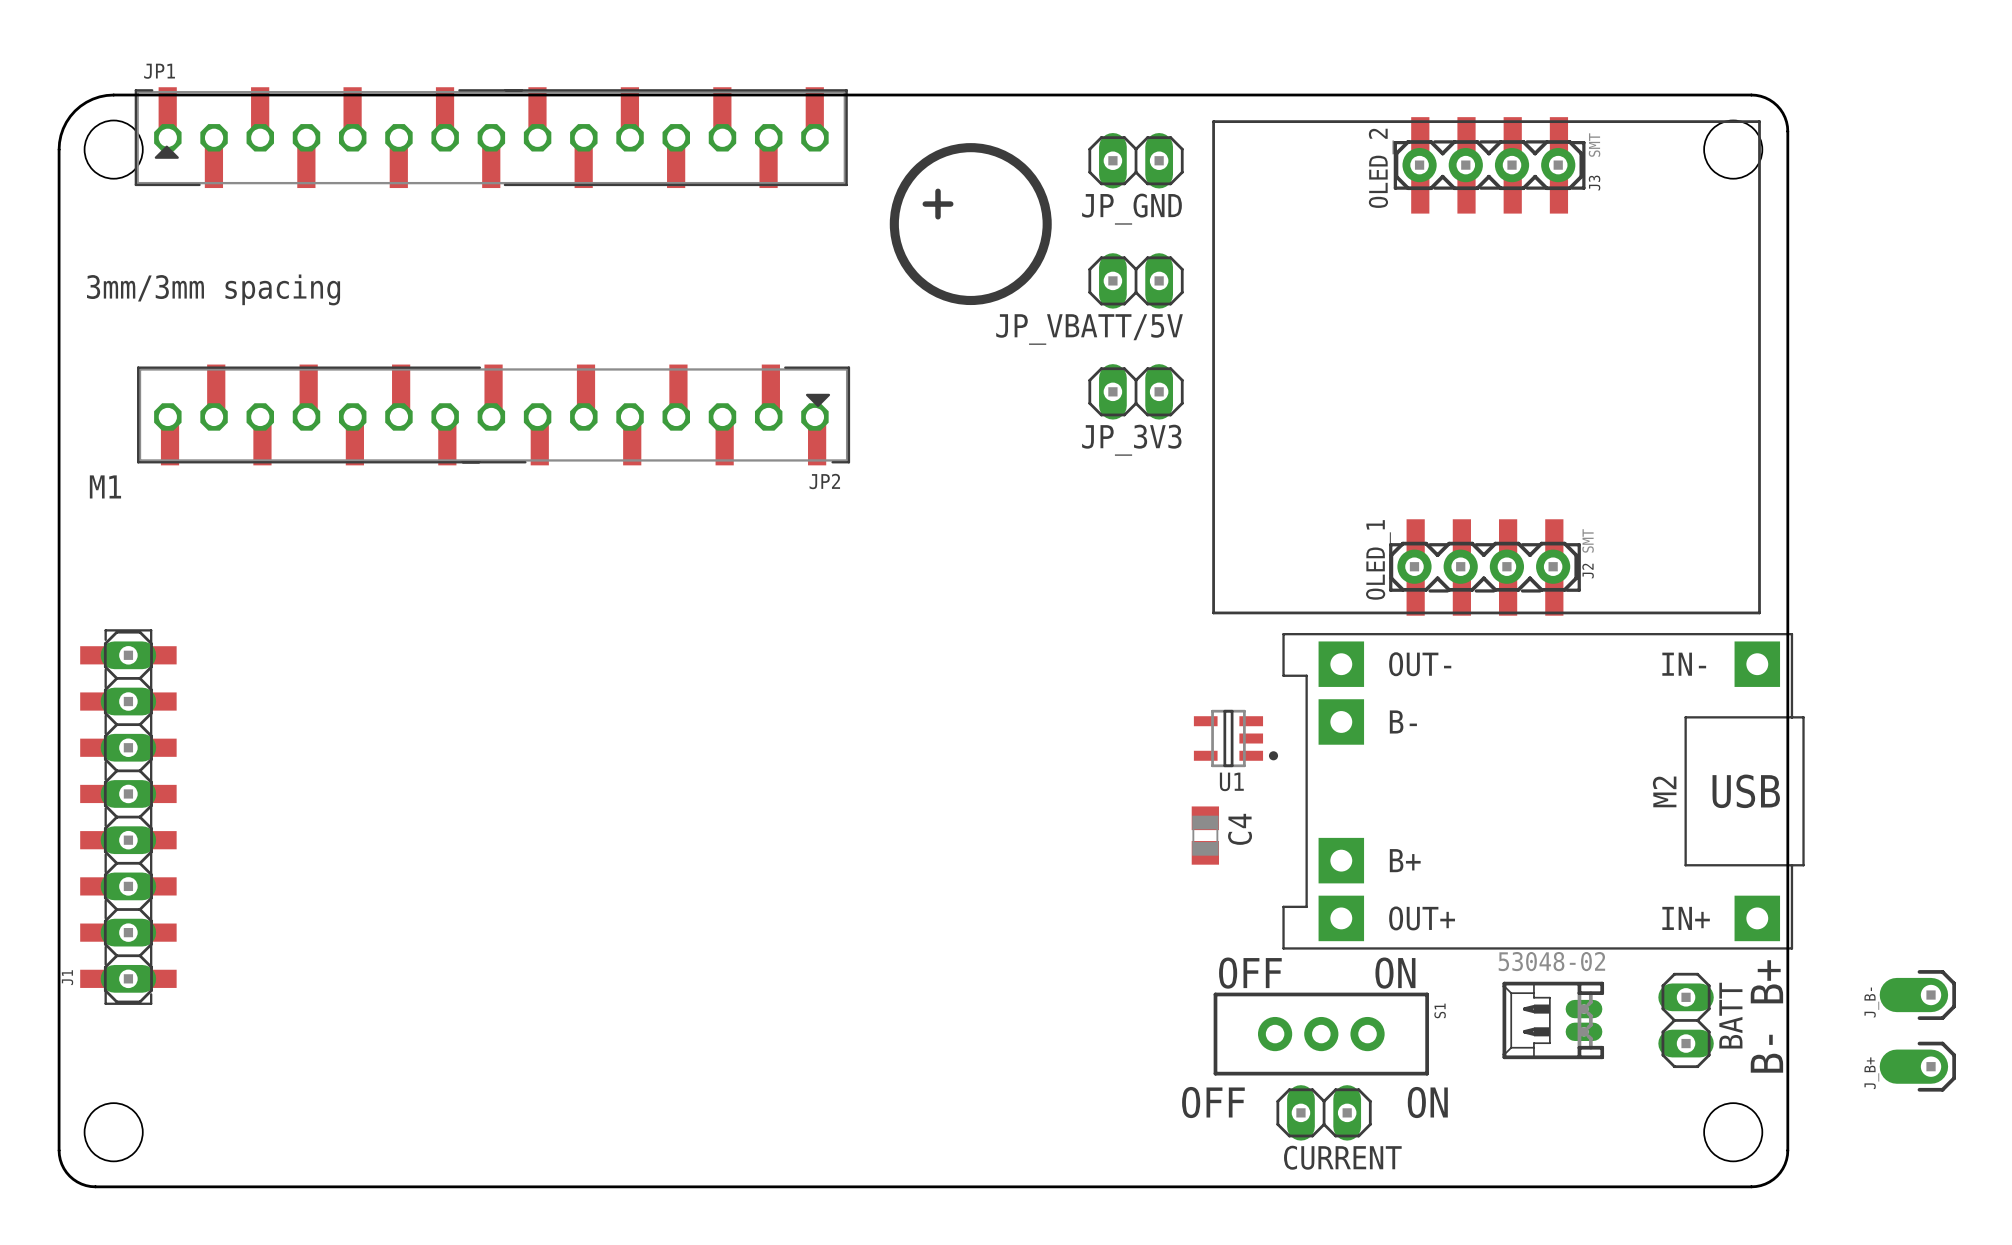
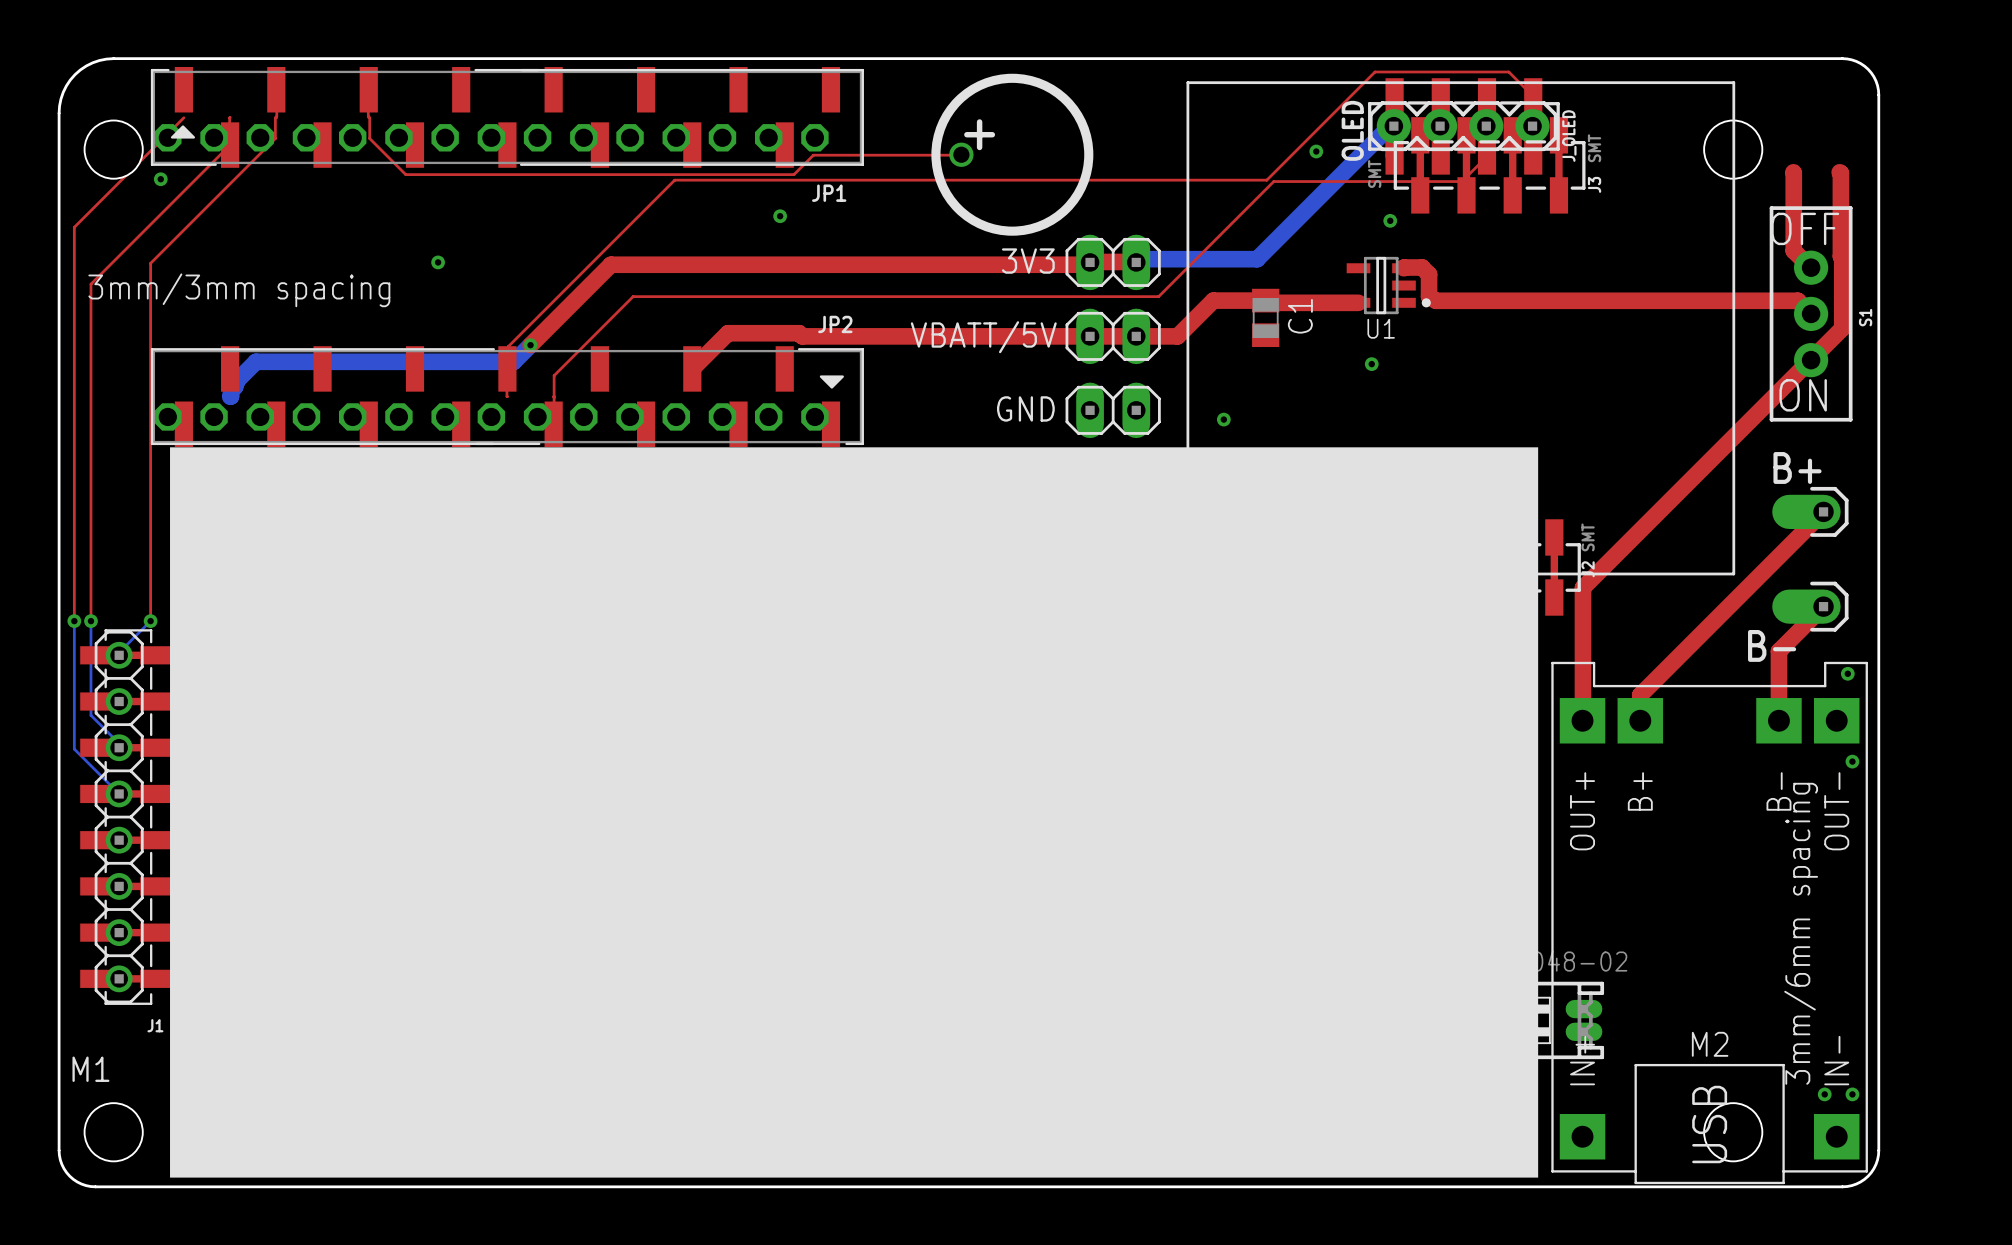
JP1 name position: JP1 (159, 71) -> JP1 (829, 193)
top track: none -> (276, 89) (275, 138) (150, 263) (150, 621)
top track: none -> (368, 89) (369, 138) (405, 174) (793, 174) (813, 155) (961, 154)
top track: none -> (1533, 95) (1508, 72) (1374, 72) (1266, 180) (674, 180) (508, 346) (507, 396)
top track: none -> (183, 117) (74, 227) (74, 621)
top track: none -> (230, 117) (230, 145) (90, 284) (90, 621)
line: (1213, 121) (1759, 121) (1759, 612) (1213, 612) (1213, 121) -> (1187, 82) (1733, 82) (1733, 574) (1187, 574) (1187, 82)
bottom track: none -> (1393, 126) (1388, 127) (1257, 259) (1139, 259) (1136, 262)
OLED: none -> (1463, 126)
J_OLED: none -> SMT (1463, 126)
top track: none -> (1486, 126) (1487, 157) (1461, 181) (1273, 181) (1158, 296) (633, 296) (554, 375) (553, 424)
JP1 position: (491, 137) -> (507, 117)
board edge: (59, 149) (63, 128) (75, 111) (92, 99) (113, 95) (1751, 95) (1769, 99) (1782, 113) (1787, 131) (1787, 1150) (1785, 1164) (1777, 1176) (1765, 1184) (1751, 1186) -> (59, 149) (59, 106) (66, 85) (75, 74) (86, 65) (99, 60) (113, 58) (1842, 58) (1860, 63) (1873, 76) (1878, 95) (1878, 1155) (1873, 1168) (1868, 1176) (1851, 1185) (1751, 1186)
via: none -> (1316, 151)
via: none -> (961, 154)
JP_GND: (1136, 160) -> none
OLED_2: (1488, 165) -> none
top track: none -> (1793, 172) (1793, 250) (1811, 267)
top track: none -> (1839, 172) (1842, 328) (1582, 587) (1582, 720)
via: none -> (160, 179)
line: (938, 191) (938, 216) -> (979, 121) (979, 147)
line: (925, 204) (950, 204) -> (966, 134) (992, 134)
via: none -> (780, 216)
via: none -> (1390, 220)
drawing position: (970, 224) -> (1012, 154)
text: none -> OFF (1805, 228)
via: none -> (438, 262)
3V3: none -> (1113, 262)
top track: none -> (1136, 262) (1090, 261) (1082, 264) (610, 264) (530, 345)
top track: none -> (1404, 268) (1422, 267) (1429, 274) (1429, 296) (1436, 300) (1797, 300) (1811, 313)
JP_VBATT/5V: (1136, 280) -> none
top track: none -> (1358, 302) (1213, 300) (1177, 336) (802, 336) (799, 333) (728, 333) (692, 368)
C1: none -> (1265, 317)
VBATT/5V: none -> (1113, 336)
bottom track: none -> (530, 345) (513, 361) (255, 361) (236, 381) (230, 396)
via: none -> (530, 345)
via: none -> (1371, 364)
JP_3V3: (1136, 391) -> none
text: none -> ON (1803, 395)
GND: none -> (1113, 410)
JP2 position: (493, 414) -> (507, 396)
via: none -> (1223, 419)
drawing: none -> [170, 447, 1539, 1178]
JP2 name position: JP2 (824, 481) -> JP2 (835, 324)
M1 name position: M1 (105, 486) -> M1 (90, 1069)
B+: none -> (1810, 511)
top track: none -> (1823, 511) (1640, 695) (1640, 720)
OLED_1: (1483, 566) -> none
B-: none -> (1810, 606)
top track: none -> (1823, 606) (1778, 651) (1778, 720)
bottom track: none -> (74, 621) (74, 749) (119, 793)
via: none -> (74, 621)
bottom track: none -> (90, 621) (90, 715) (118, 743) (119, 747)
via: none -> (90, 621)
bottom track: none -> (150, 621) (120, 651) (119, 655)
via: none -> (150, 621)
M1 footprint: [100, 630, 157, 1004] -> [94, 630, 144, 1004]
M2 footprint: [1282, 633, 1805, 950] -> [1551, 661, 1868, 1185]
via: none -> (1847, 673)
U1 position: (1235, 738) -> (1388, 285)
via: none -> (1852, 761)
M2 name position: M2 (1664, 791) -> M2 (1710, 1044)
C4: (1205, 835) -> none
text: OFF (1250, 973) -> none
text: ON (1395, 973) -> none
J1 name rotation: 0° (67, 977) -> 90° clockwise (155, 1025)
J1 name position: J1 (67, 977) -> J1 (155, 1025)
text: B+ (1766, 981) -> none
J_B-: (1917, 995) -> none
S1 name position: S1 (1440, 1010) -> S1 (1865, 317)
BATT: (1686, 1020) -> none
S1 rotation: 0° (1321, 1034) -> 90° clockwise (1811, 313)
S1 position: (1321, 1034) -> (1811, 313)
text: B- (1766, 1053) -> 3mm/6mm spacing (1801, 933)
J_B+: (1917, 1066) -> none
via: none -> (1824, 1094)
via: none -> (1852, 1094)
text: OFF (1213, 1102) -> none
text: ON (1427, 1102) -> none
CURRENT: (1324, 1112) -> none

